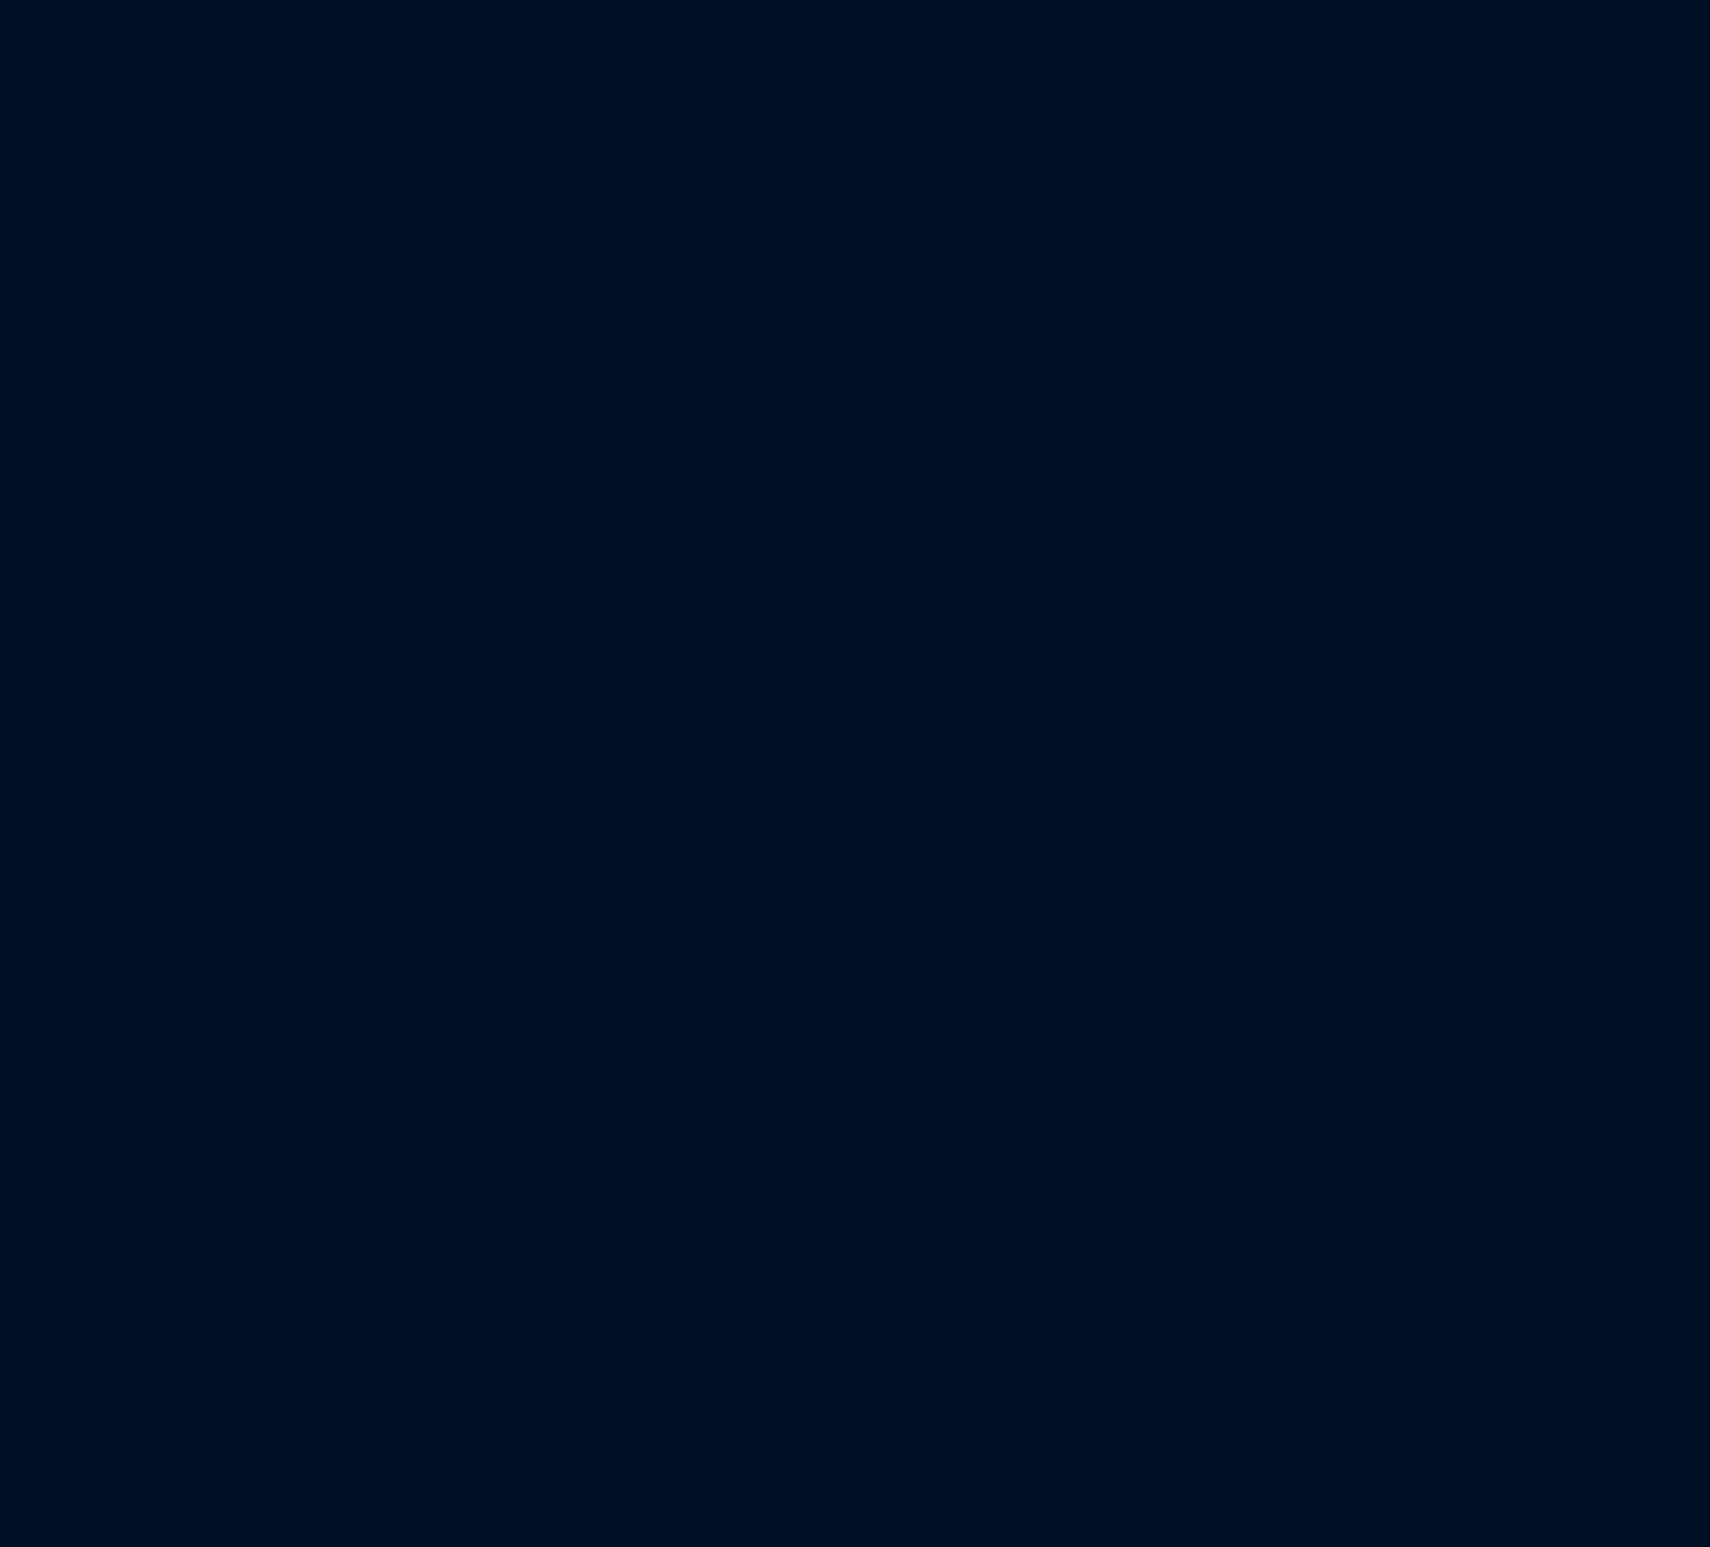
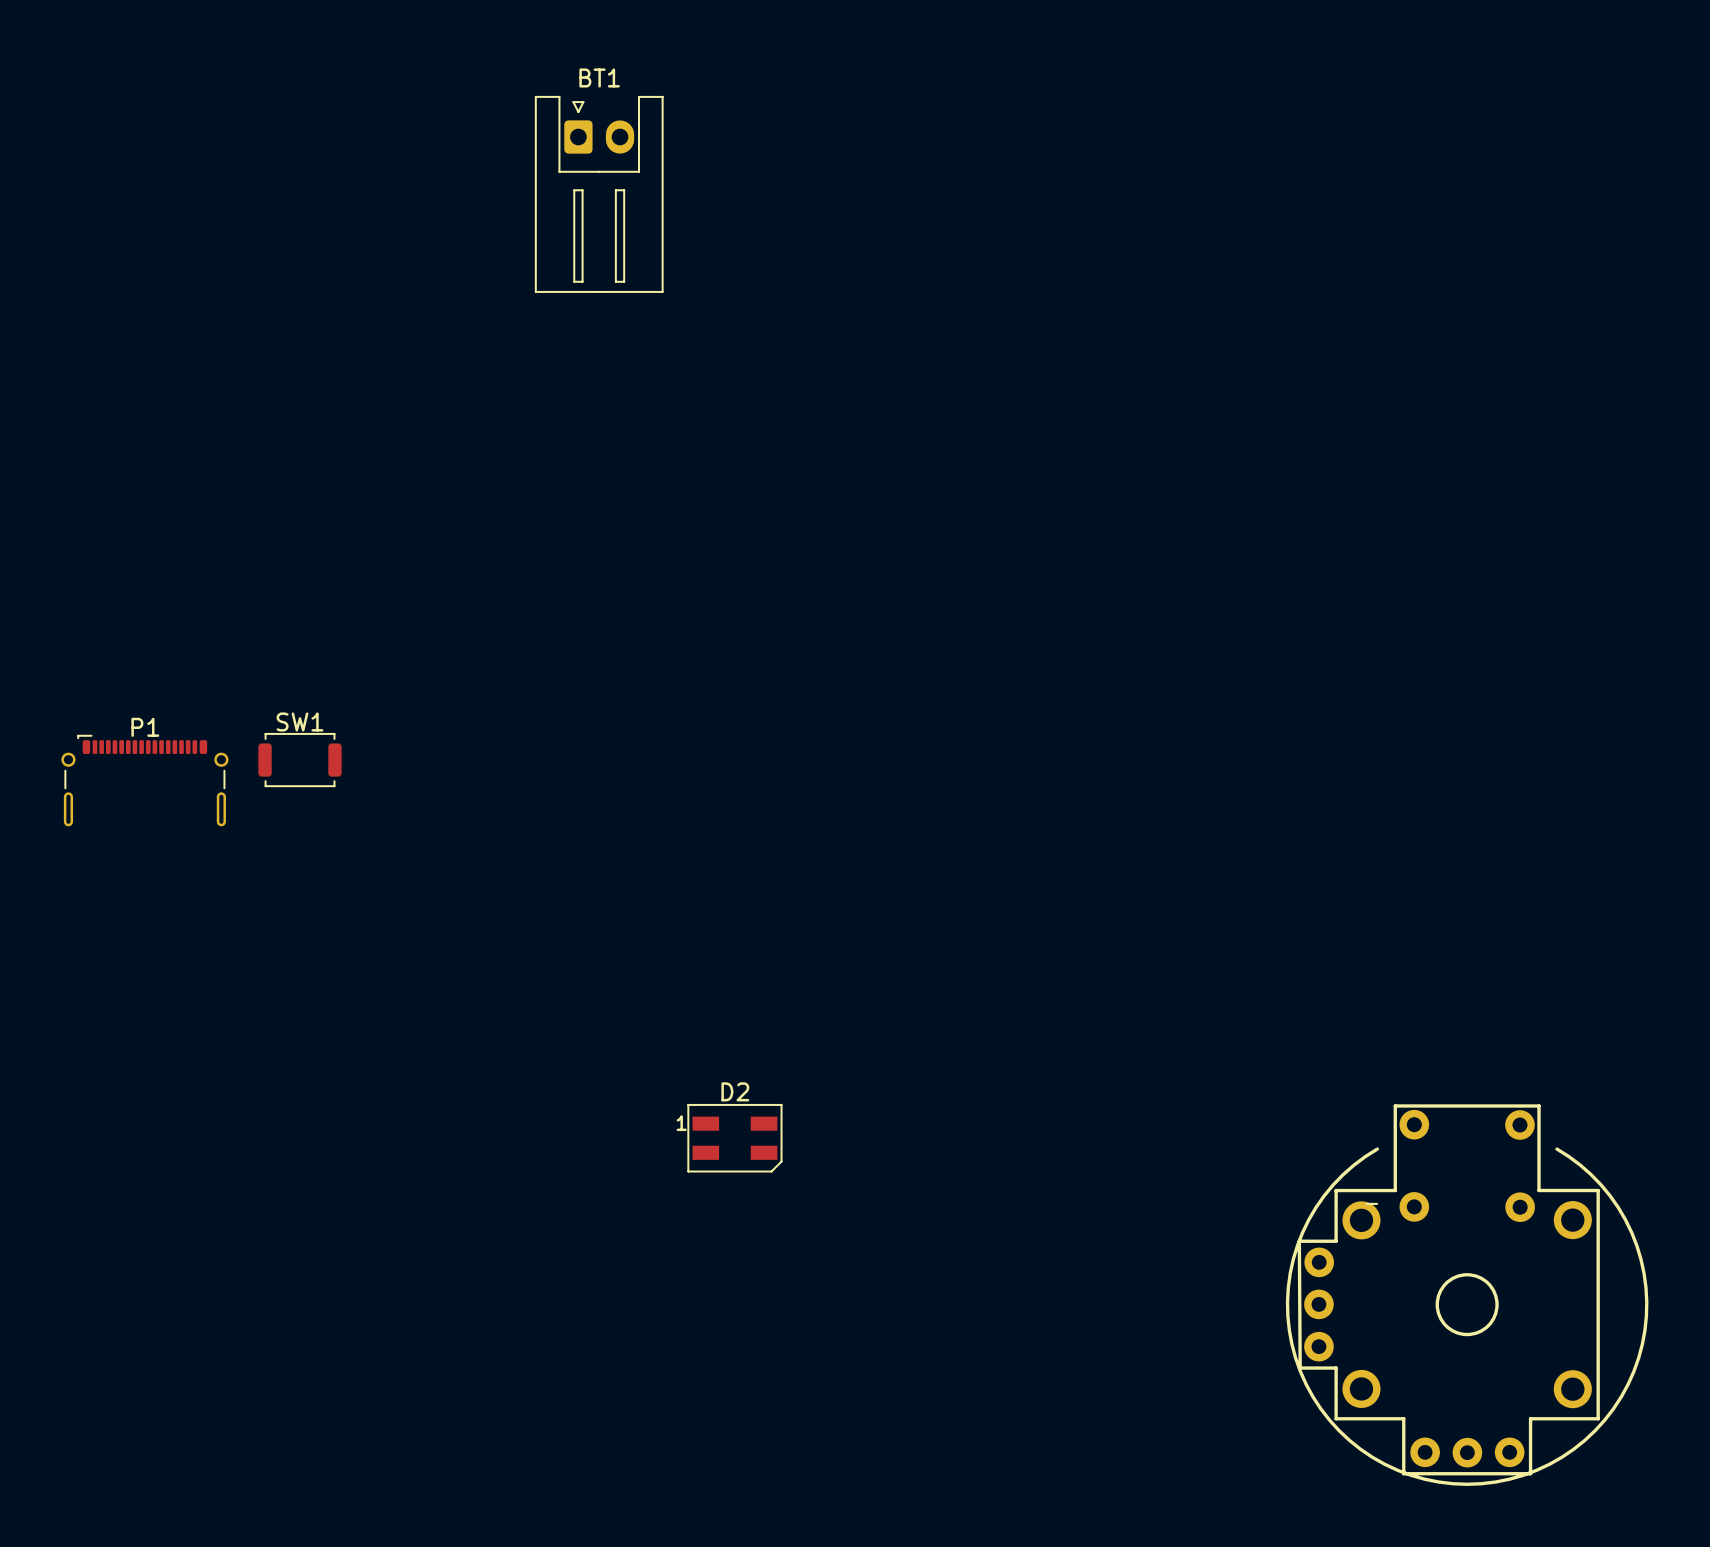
BT1: none -> (599, 194)
SW1: none -> (300, 760)
P1: none -> (144, 780)
D2: none -> (734, 1138)
part: none -> (1467, 1295)

